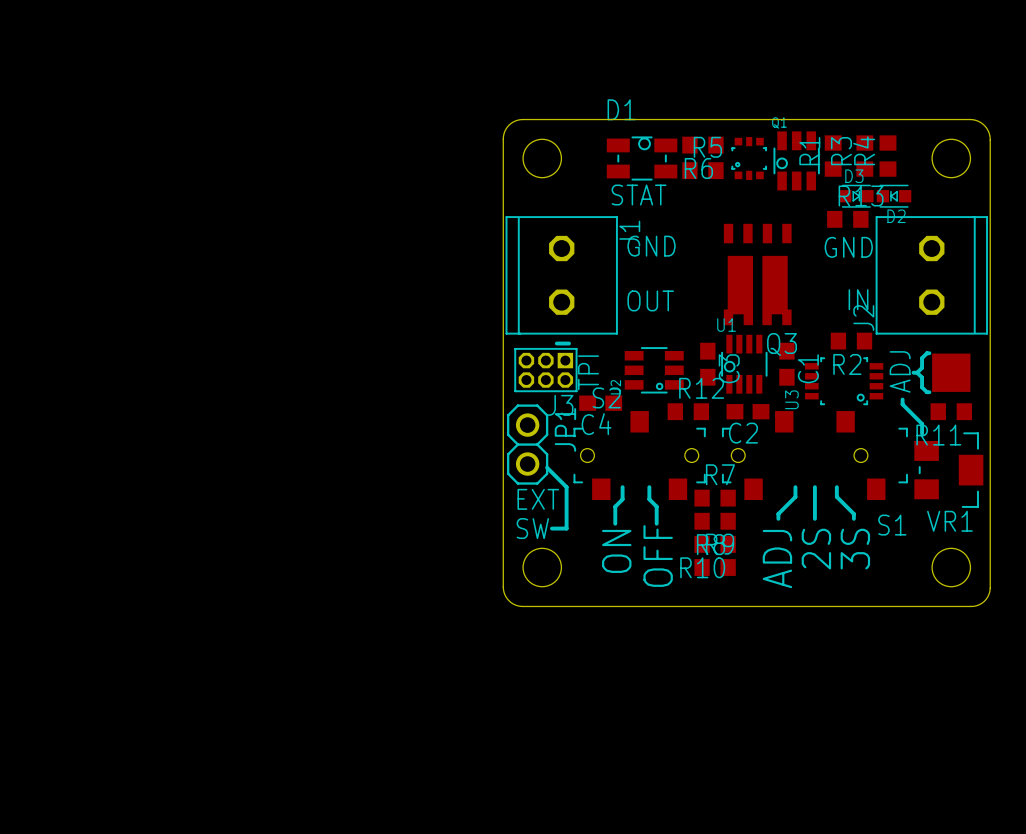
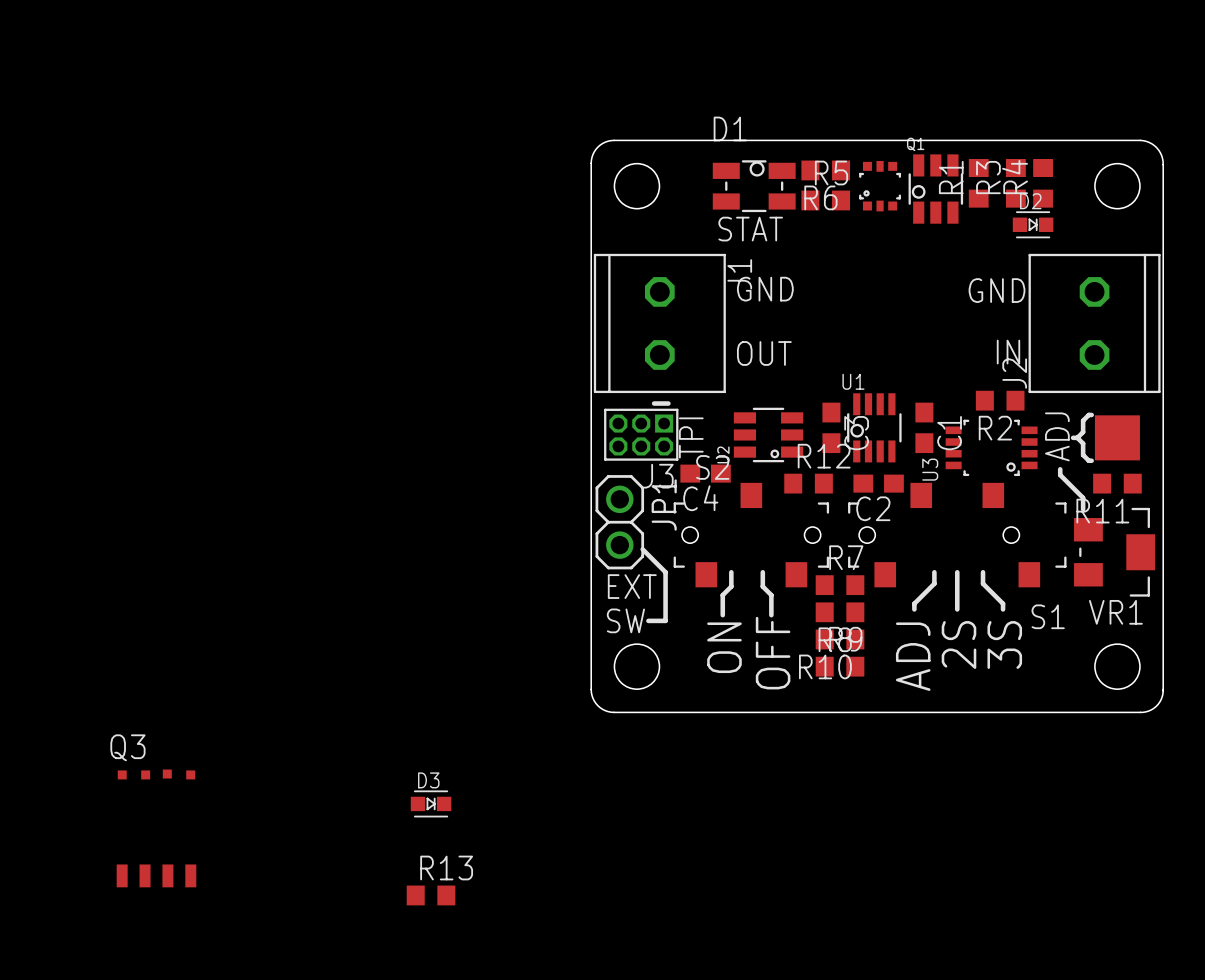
D3 position: (856, 196) -> (431, 803)
D2 rotation: 0° (894, 196) -> 180° (1033, 224)
R13 position: (847, 219) -> (431, 895)
Q3 footprint: [723, 223, 792, 326] -> [116, 769, 197, 888]
Q3 name position: Q3 (782, 344) -> Q3 (127, 747)

